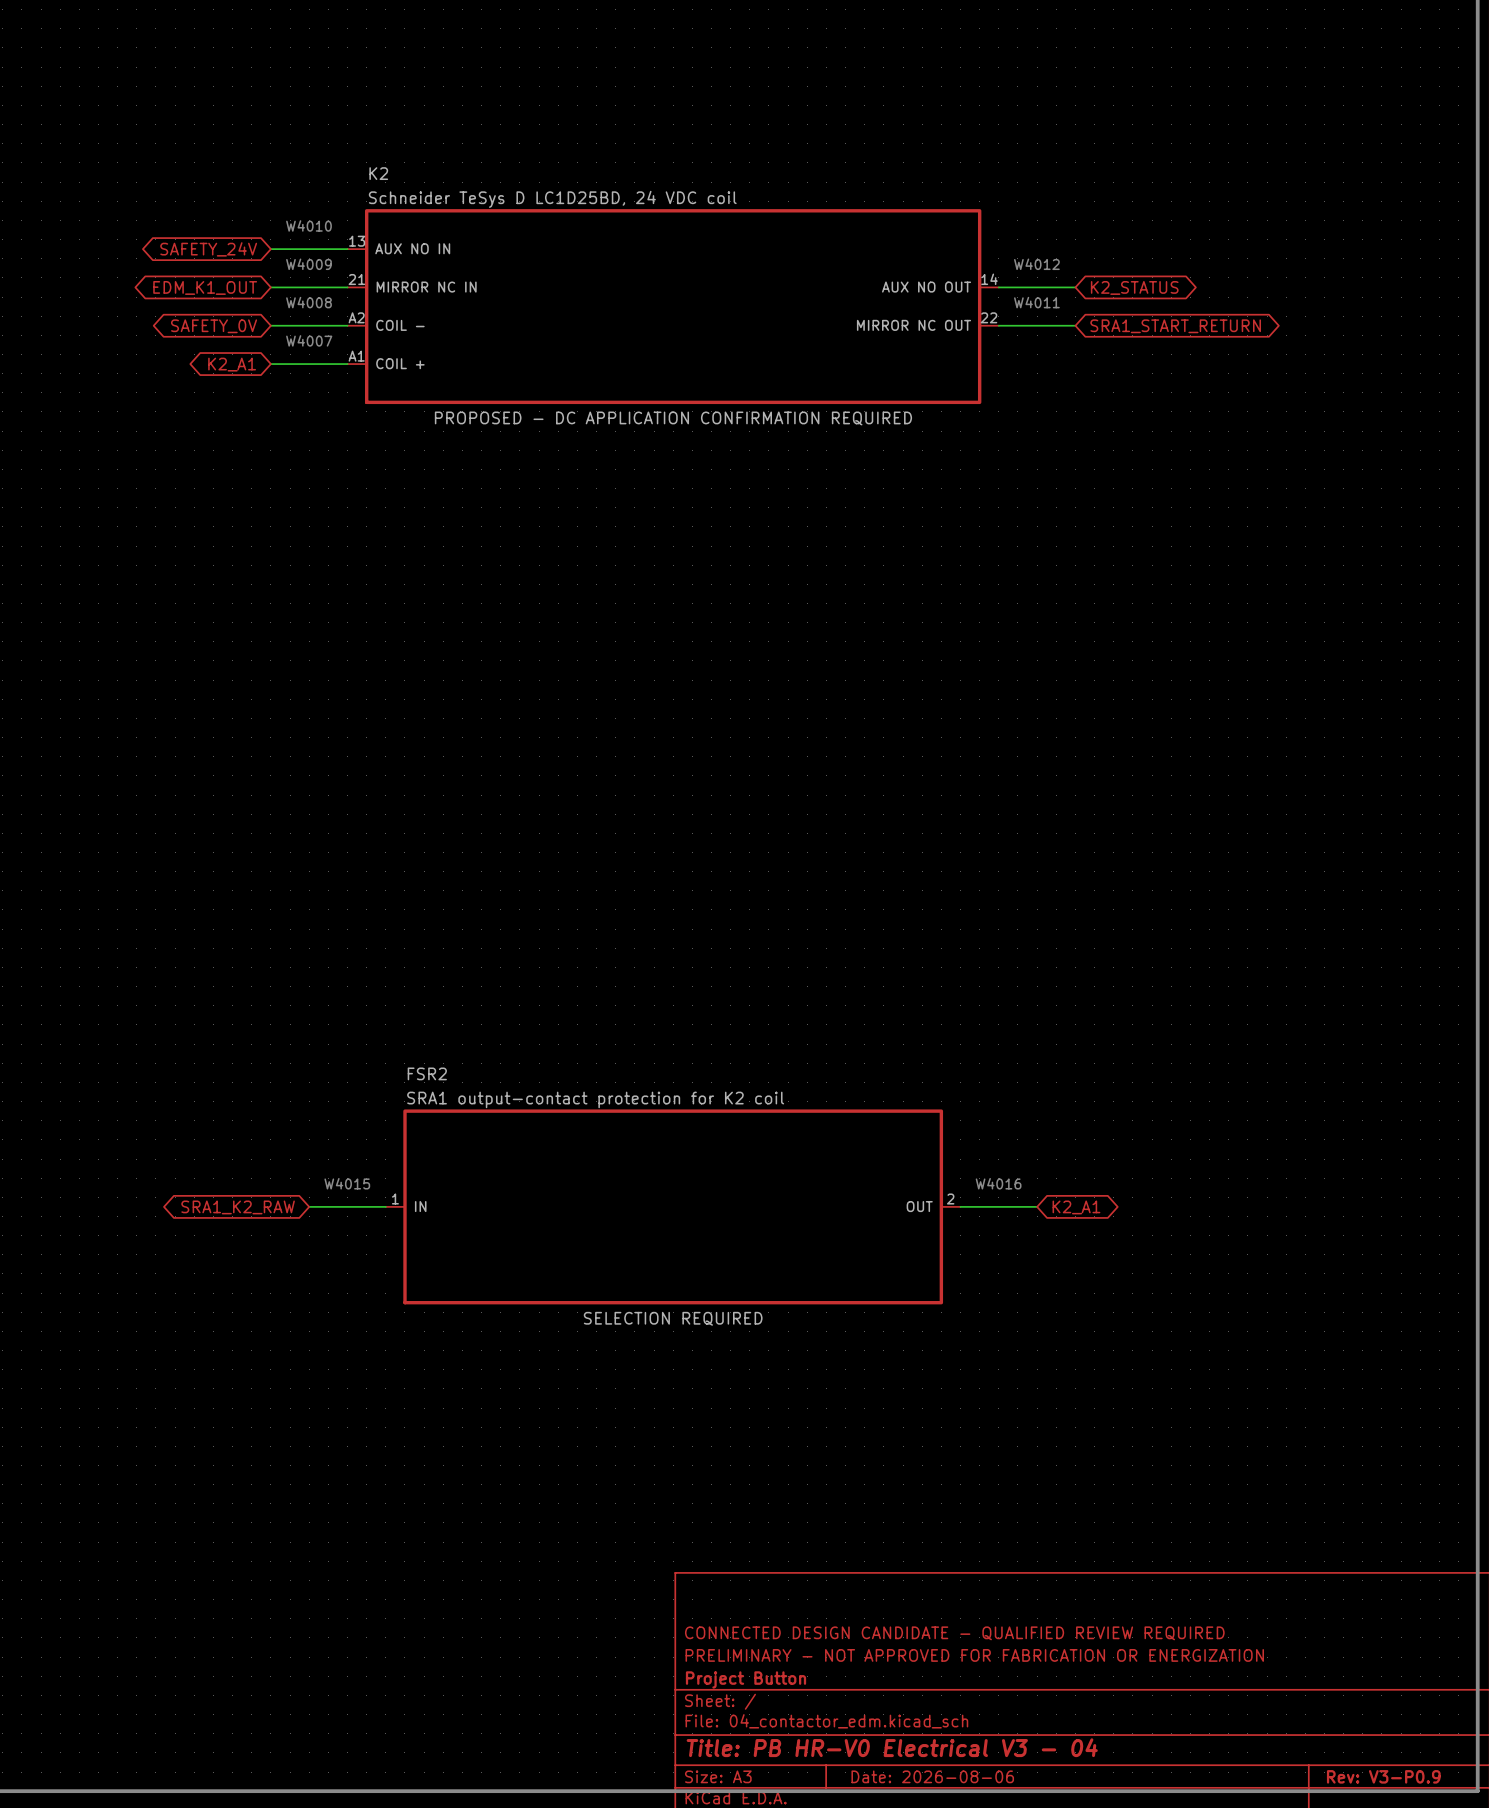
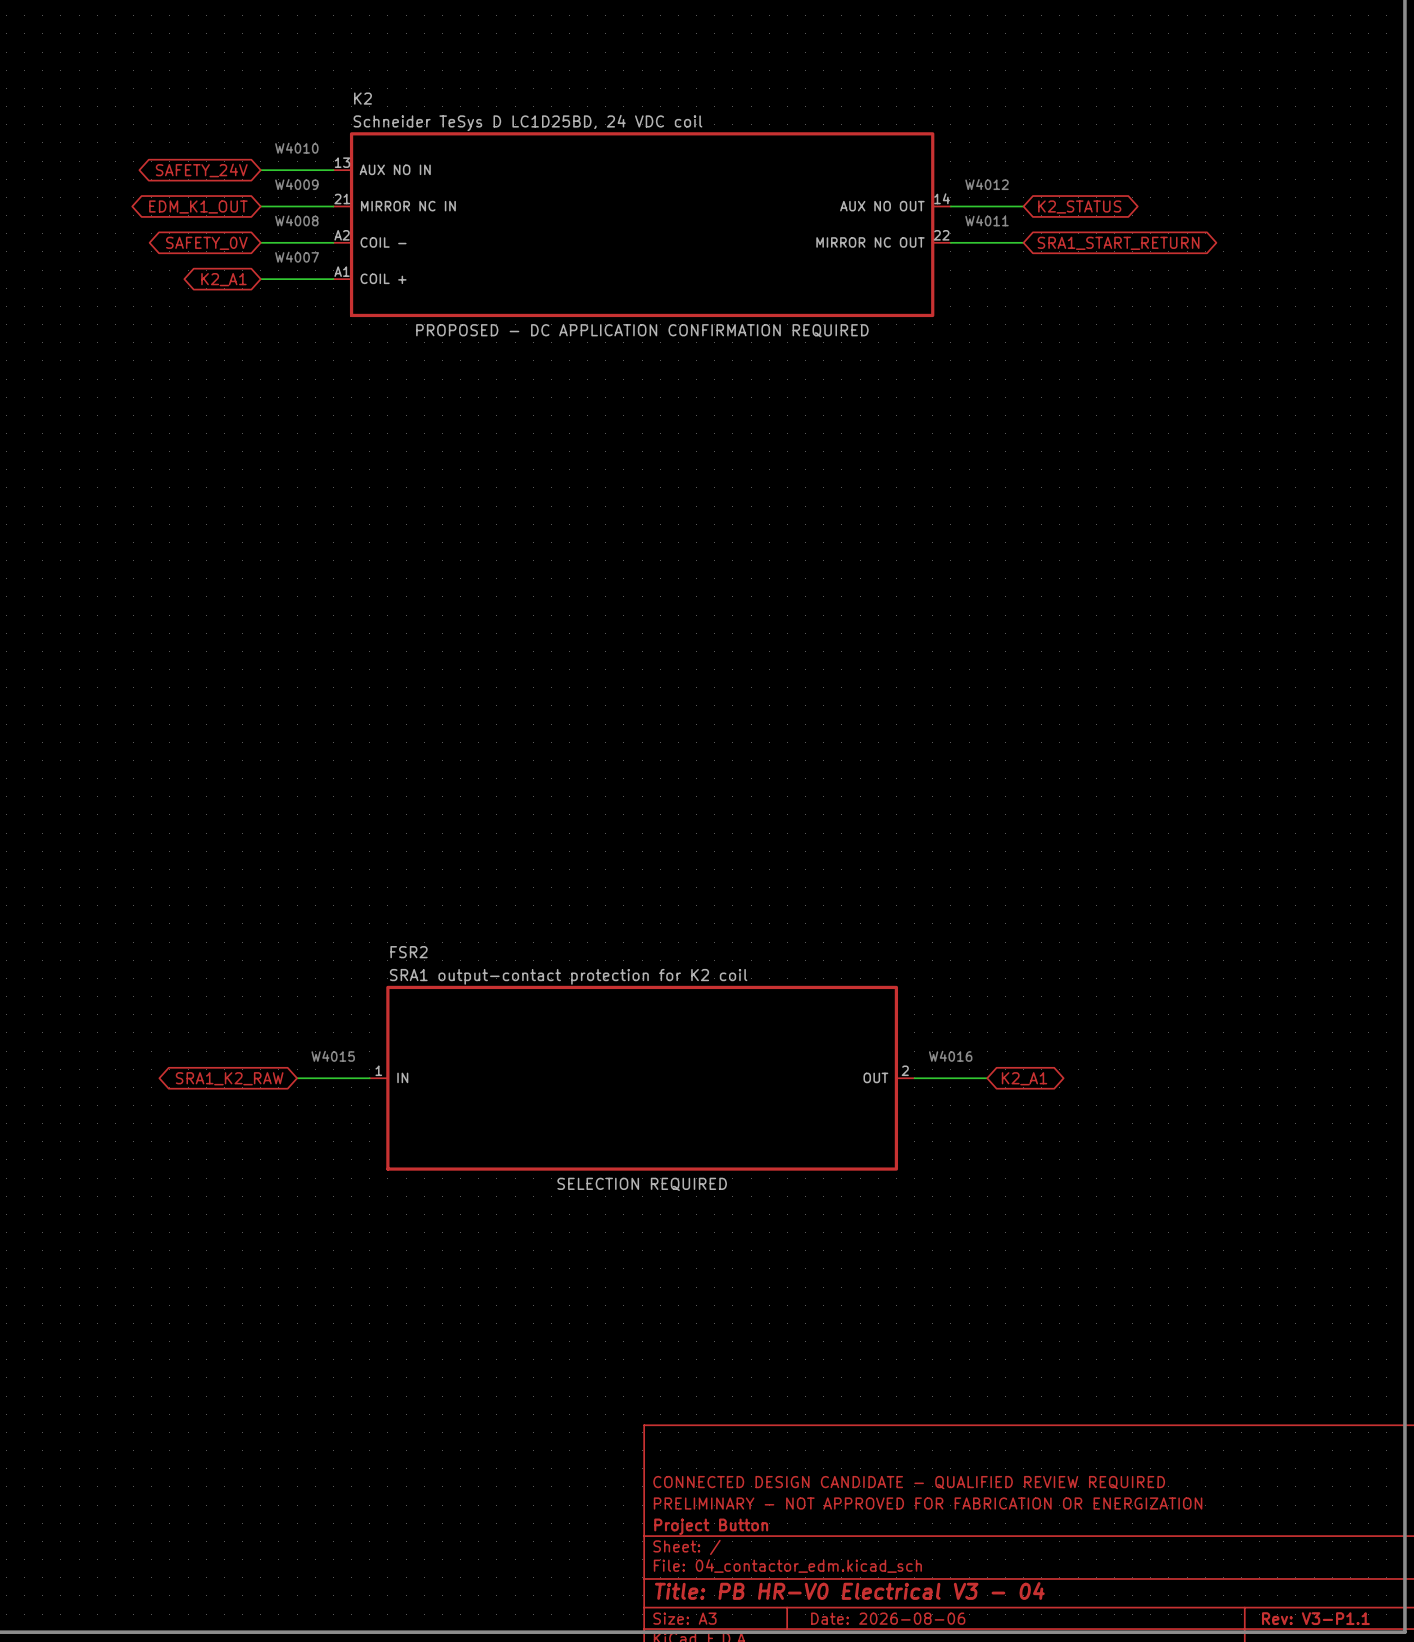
title block: Rev: V3-P0.9 (1383, 1776) -> Rev: V3-P1.1 (1315, 1618)

